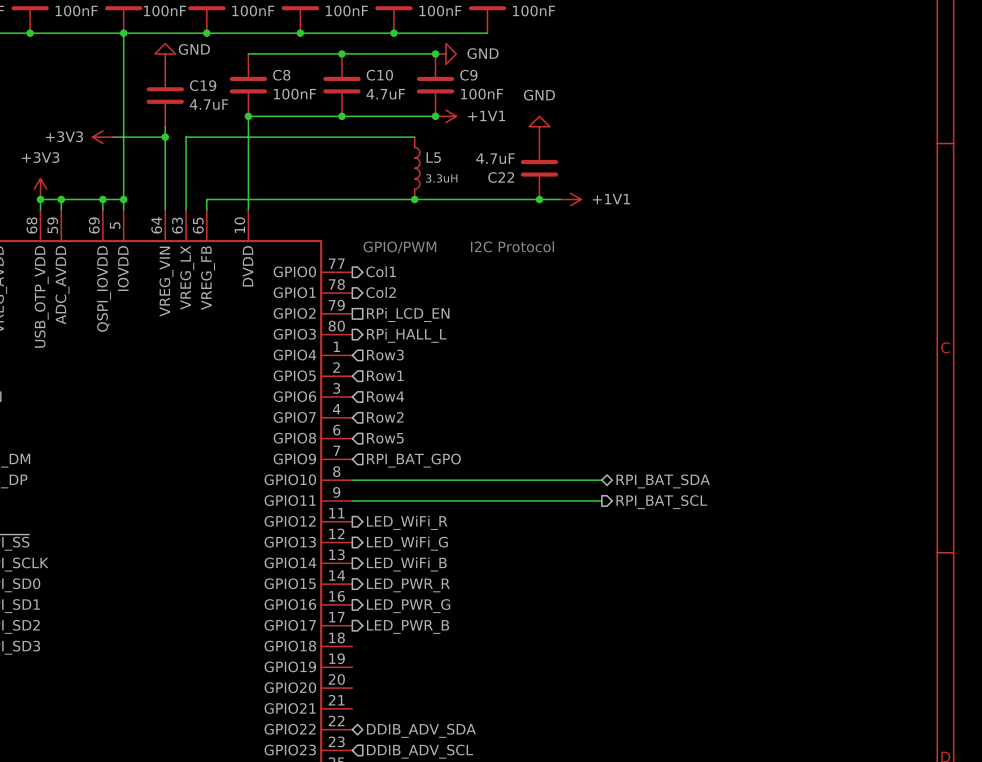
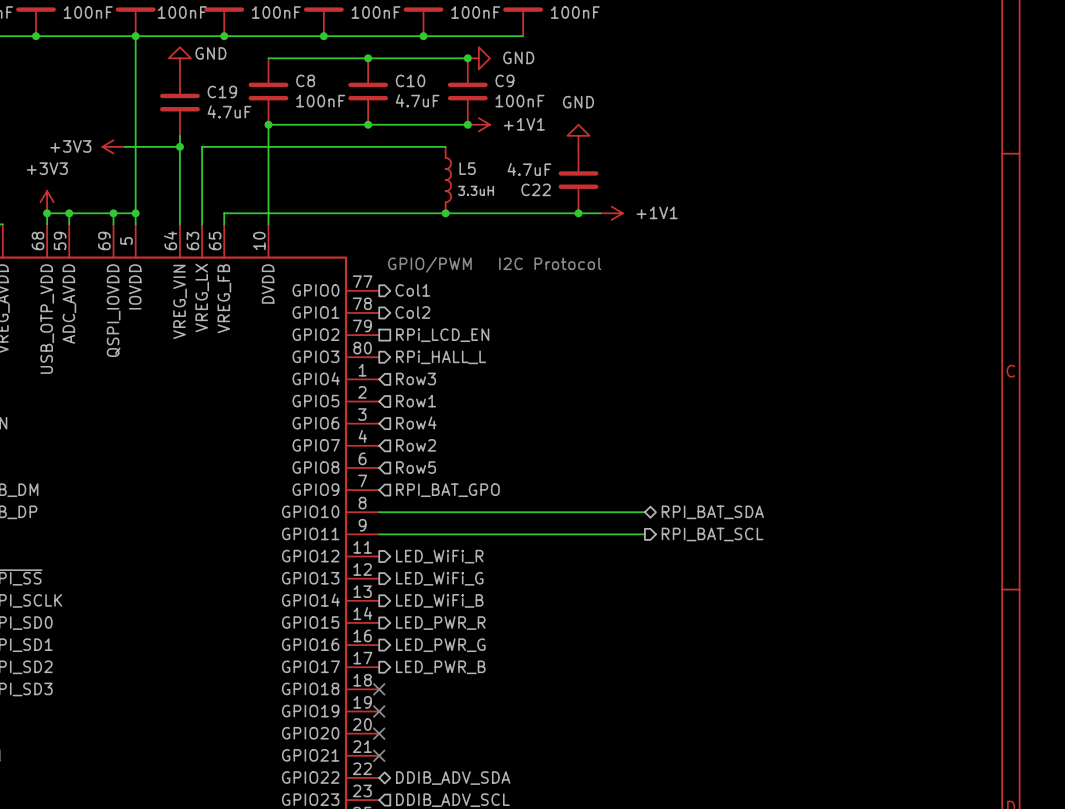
no-connect mark: none -> (379, 689)
no-connect mark: none -> (379, 711)
no-connect mark: none -> (379, 733)
no-connect mark: none -> (379, 755)

